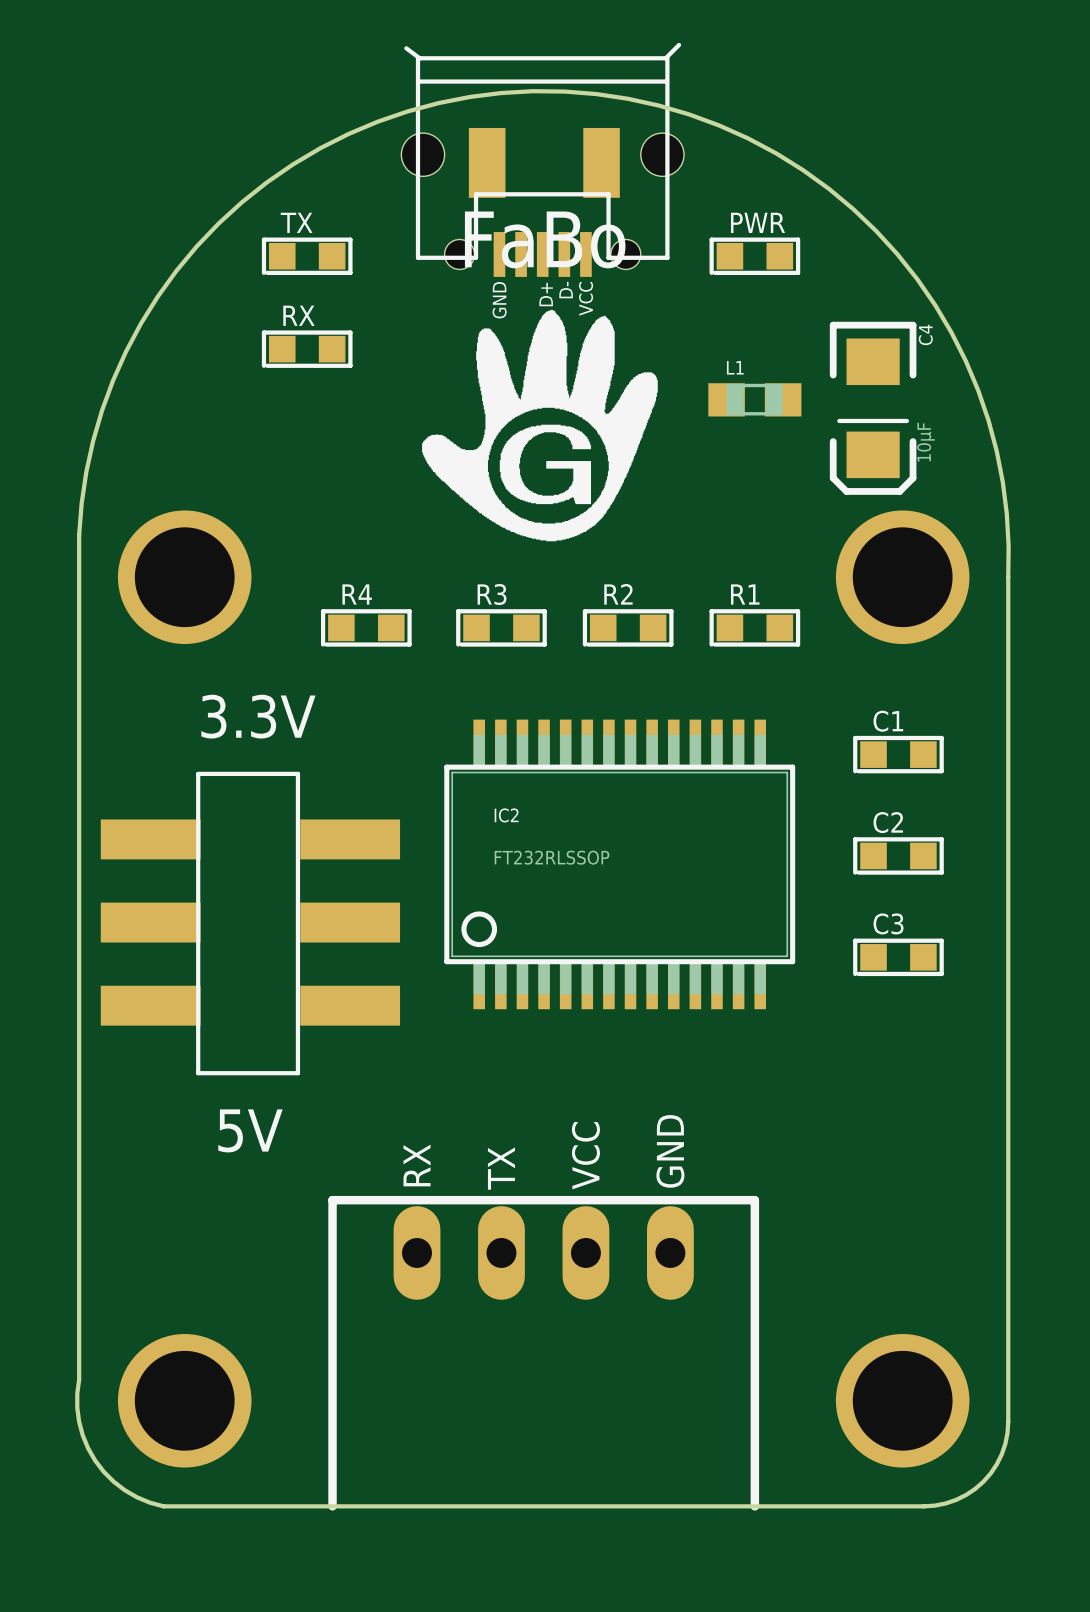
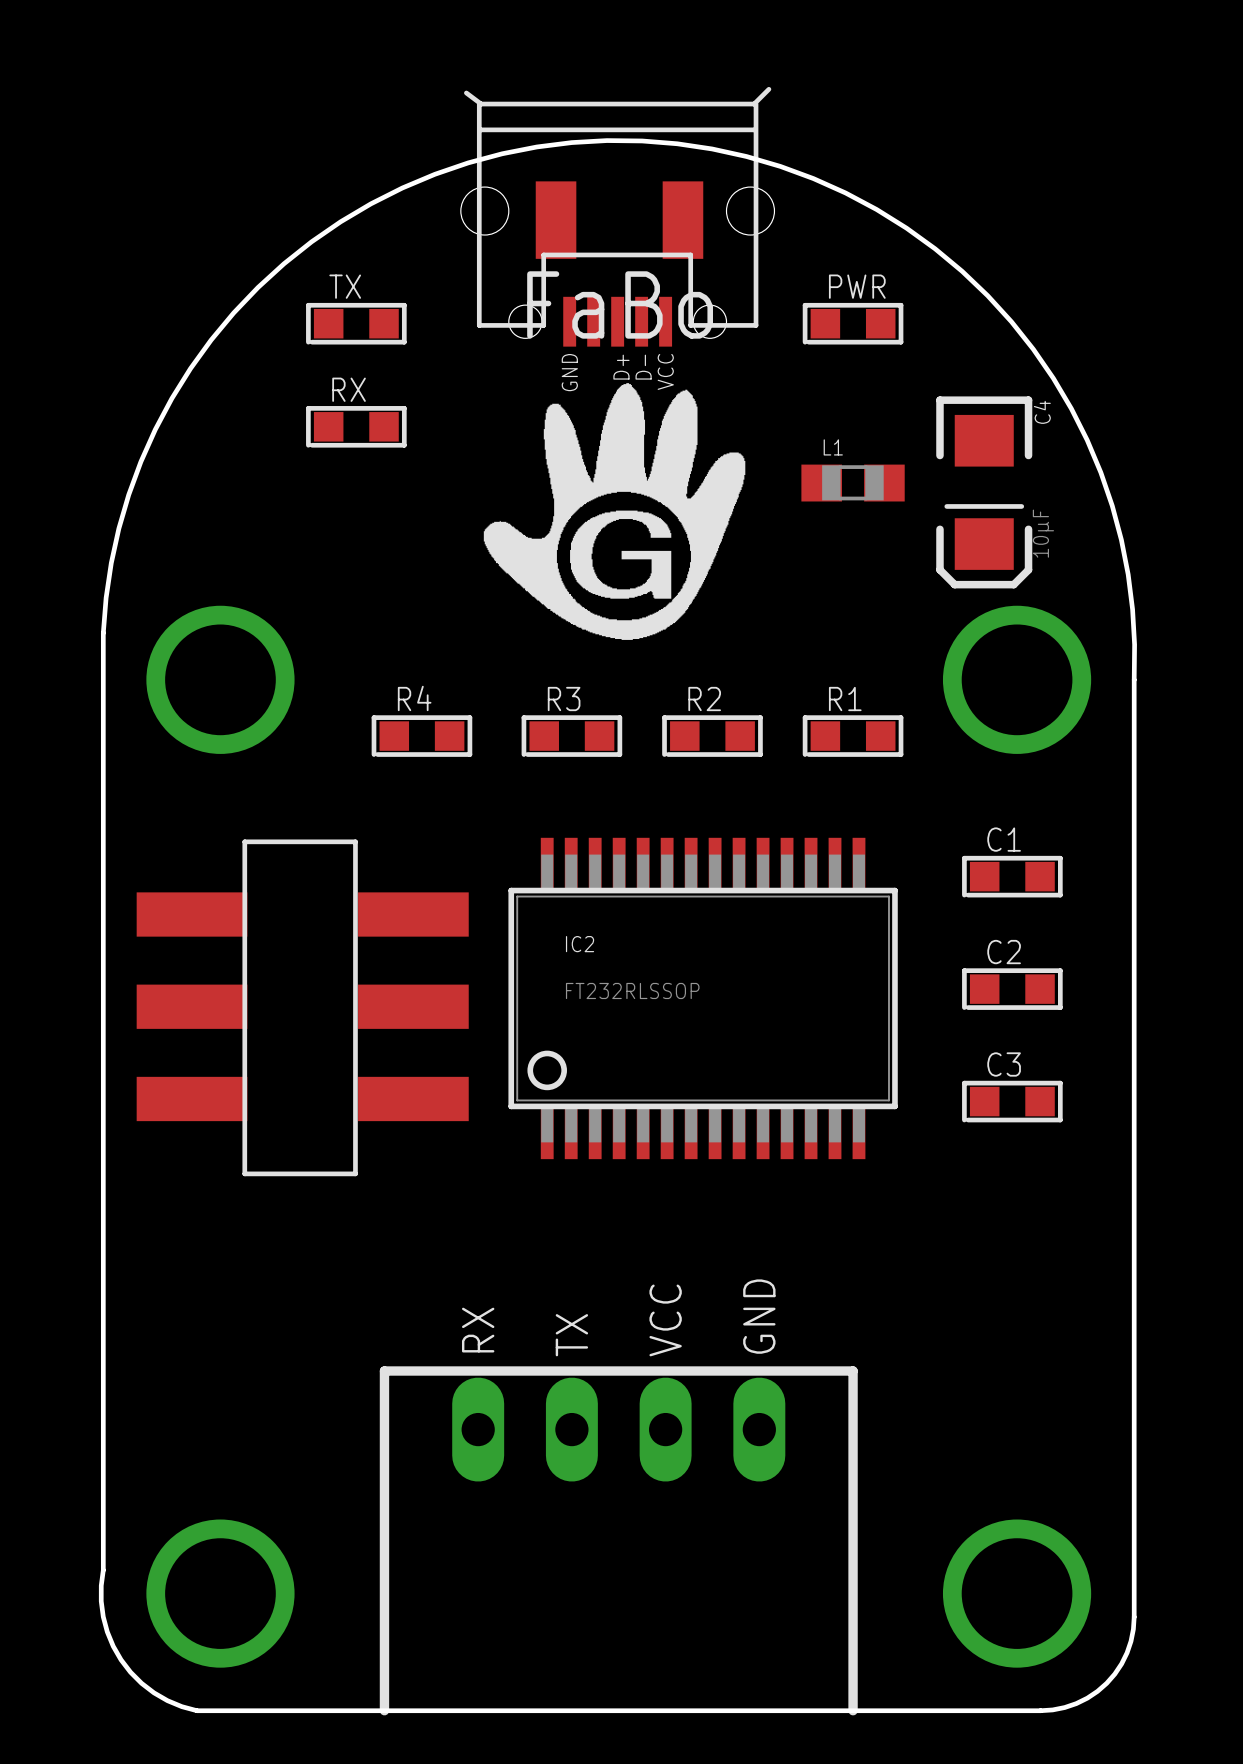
text: 3.3V (258, 716) -> none
part position: (250, 923) -> (302, 1007)
text: 5V (250, 1130) -> none

